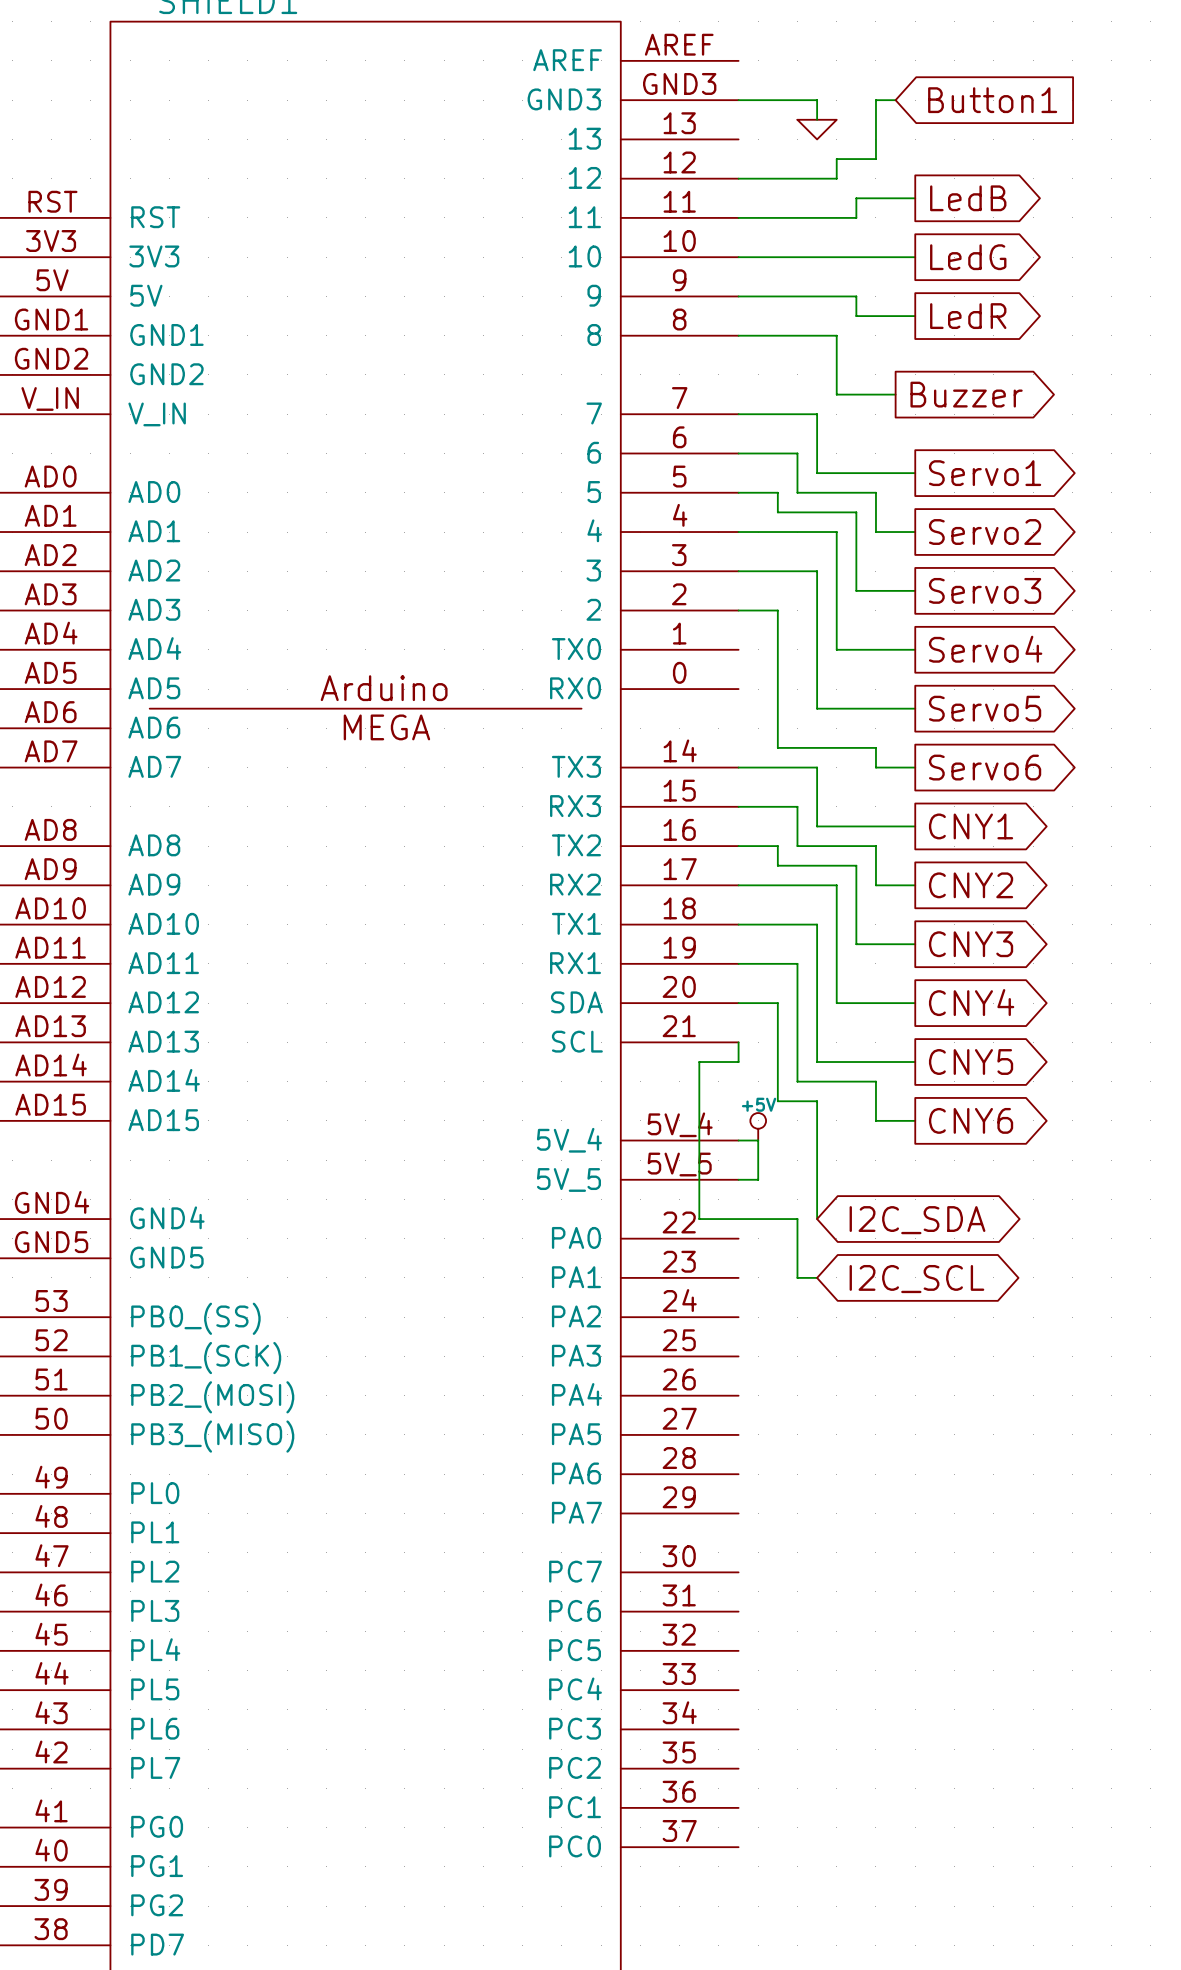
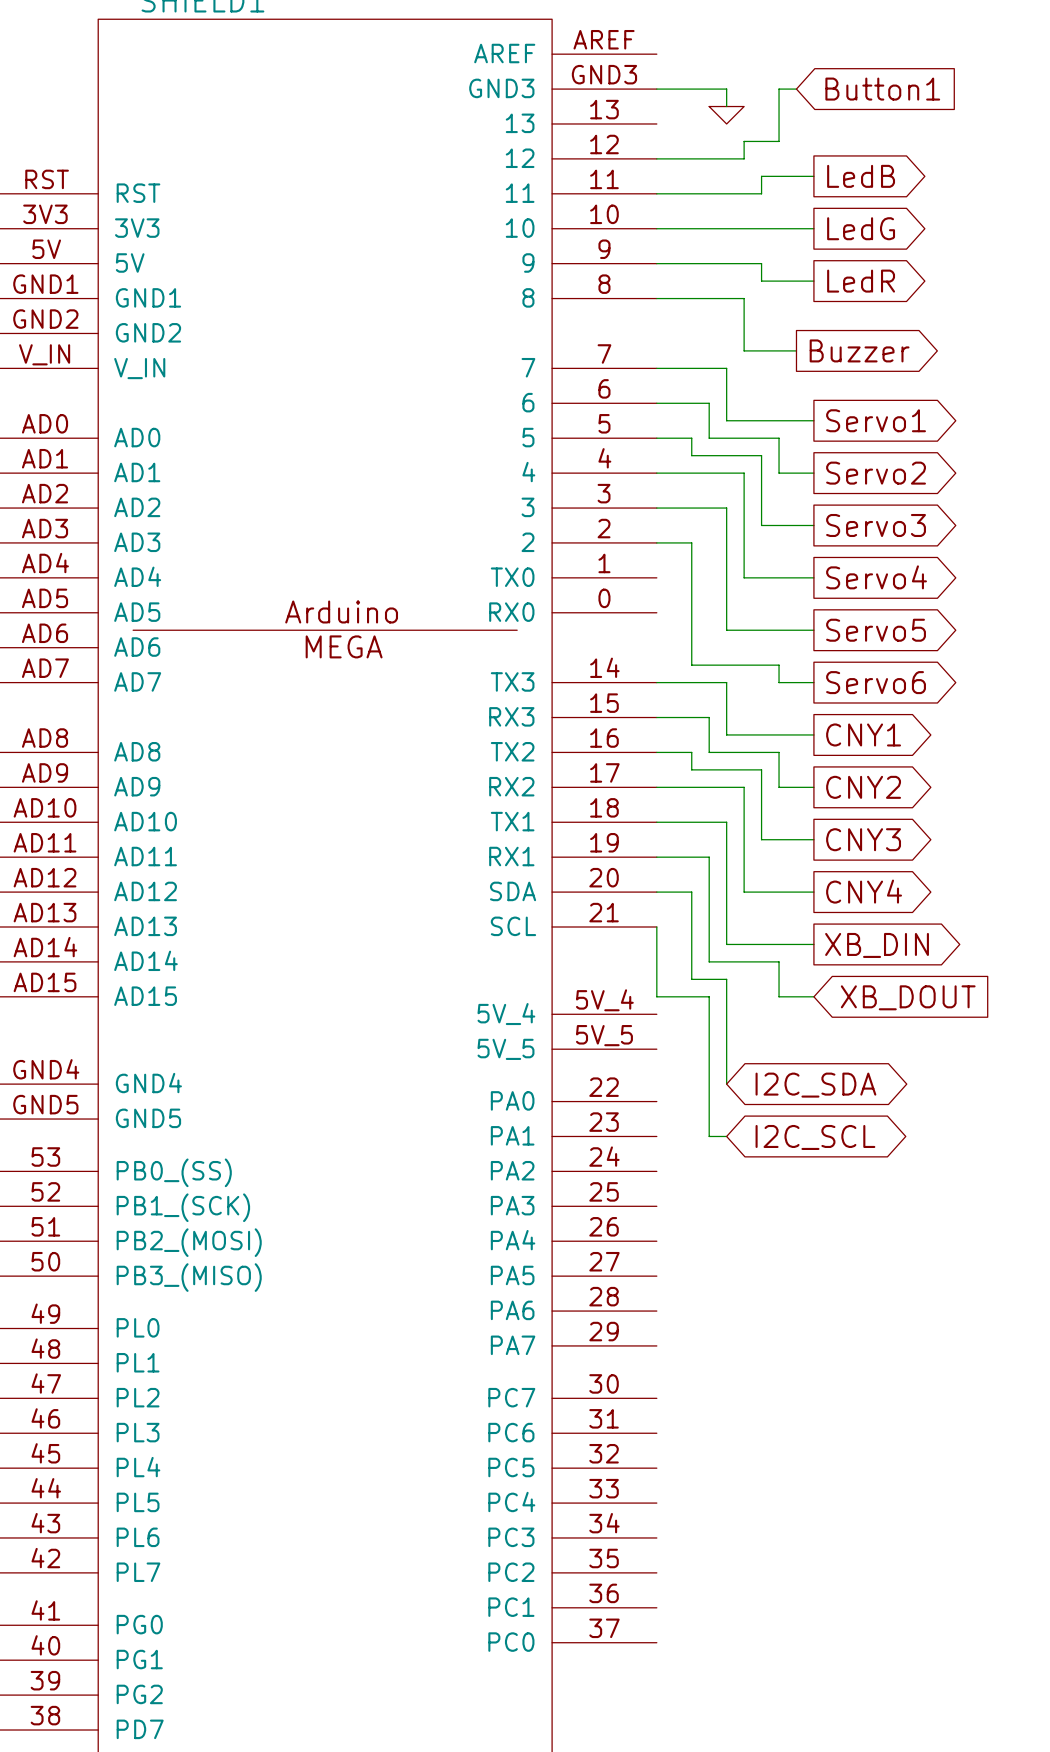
wire: (738, 1062) (699, 1062) (699, 1219) (797, 1219) -> (656, 944) (656, 996) (709, 996) (709, 1084)
global label: CNY5 (971, 1062) -> XB_DIN (877, 945)
global label shape: output (971, 1120) -> input (908, 997)
global label: CNY6 (971, 1120) -> XB_DOUT (908, 997)
power symbol: +5V (758, 1126) -> none
wire: (738, 1140) (758, 1140) (758, 1179) (738, 1179) -> none

